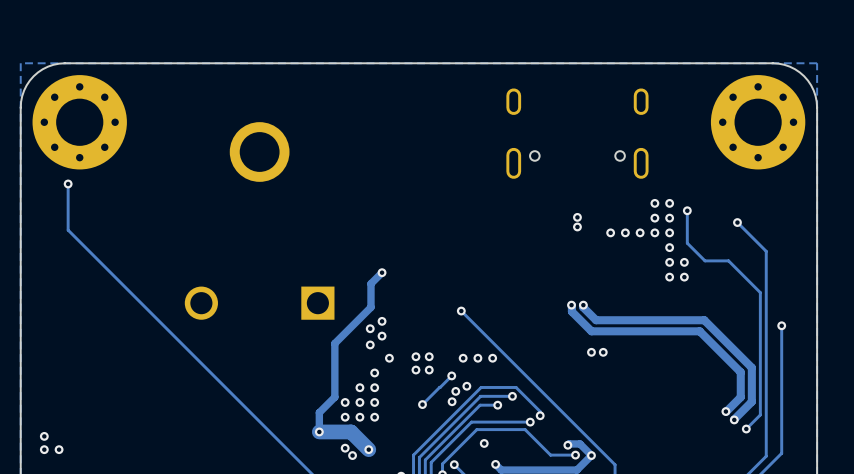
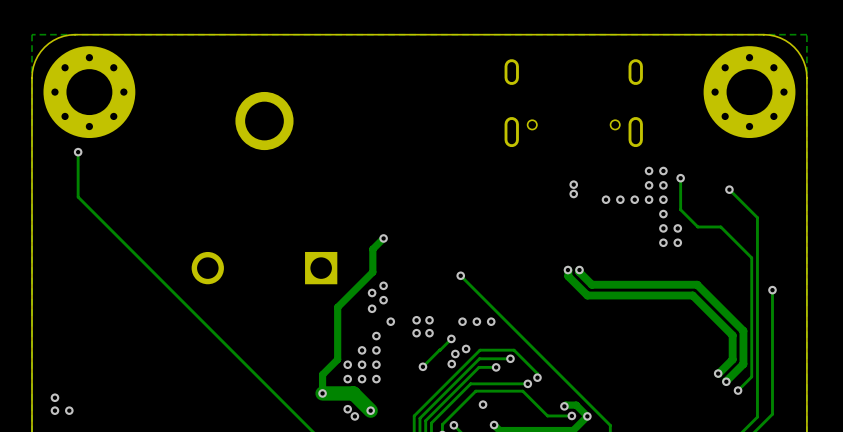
via: (591, 352) -> none
via: (603, 352) -> none

